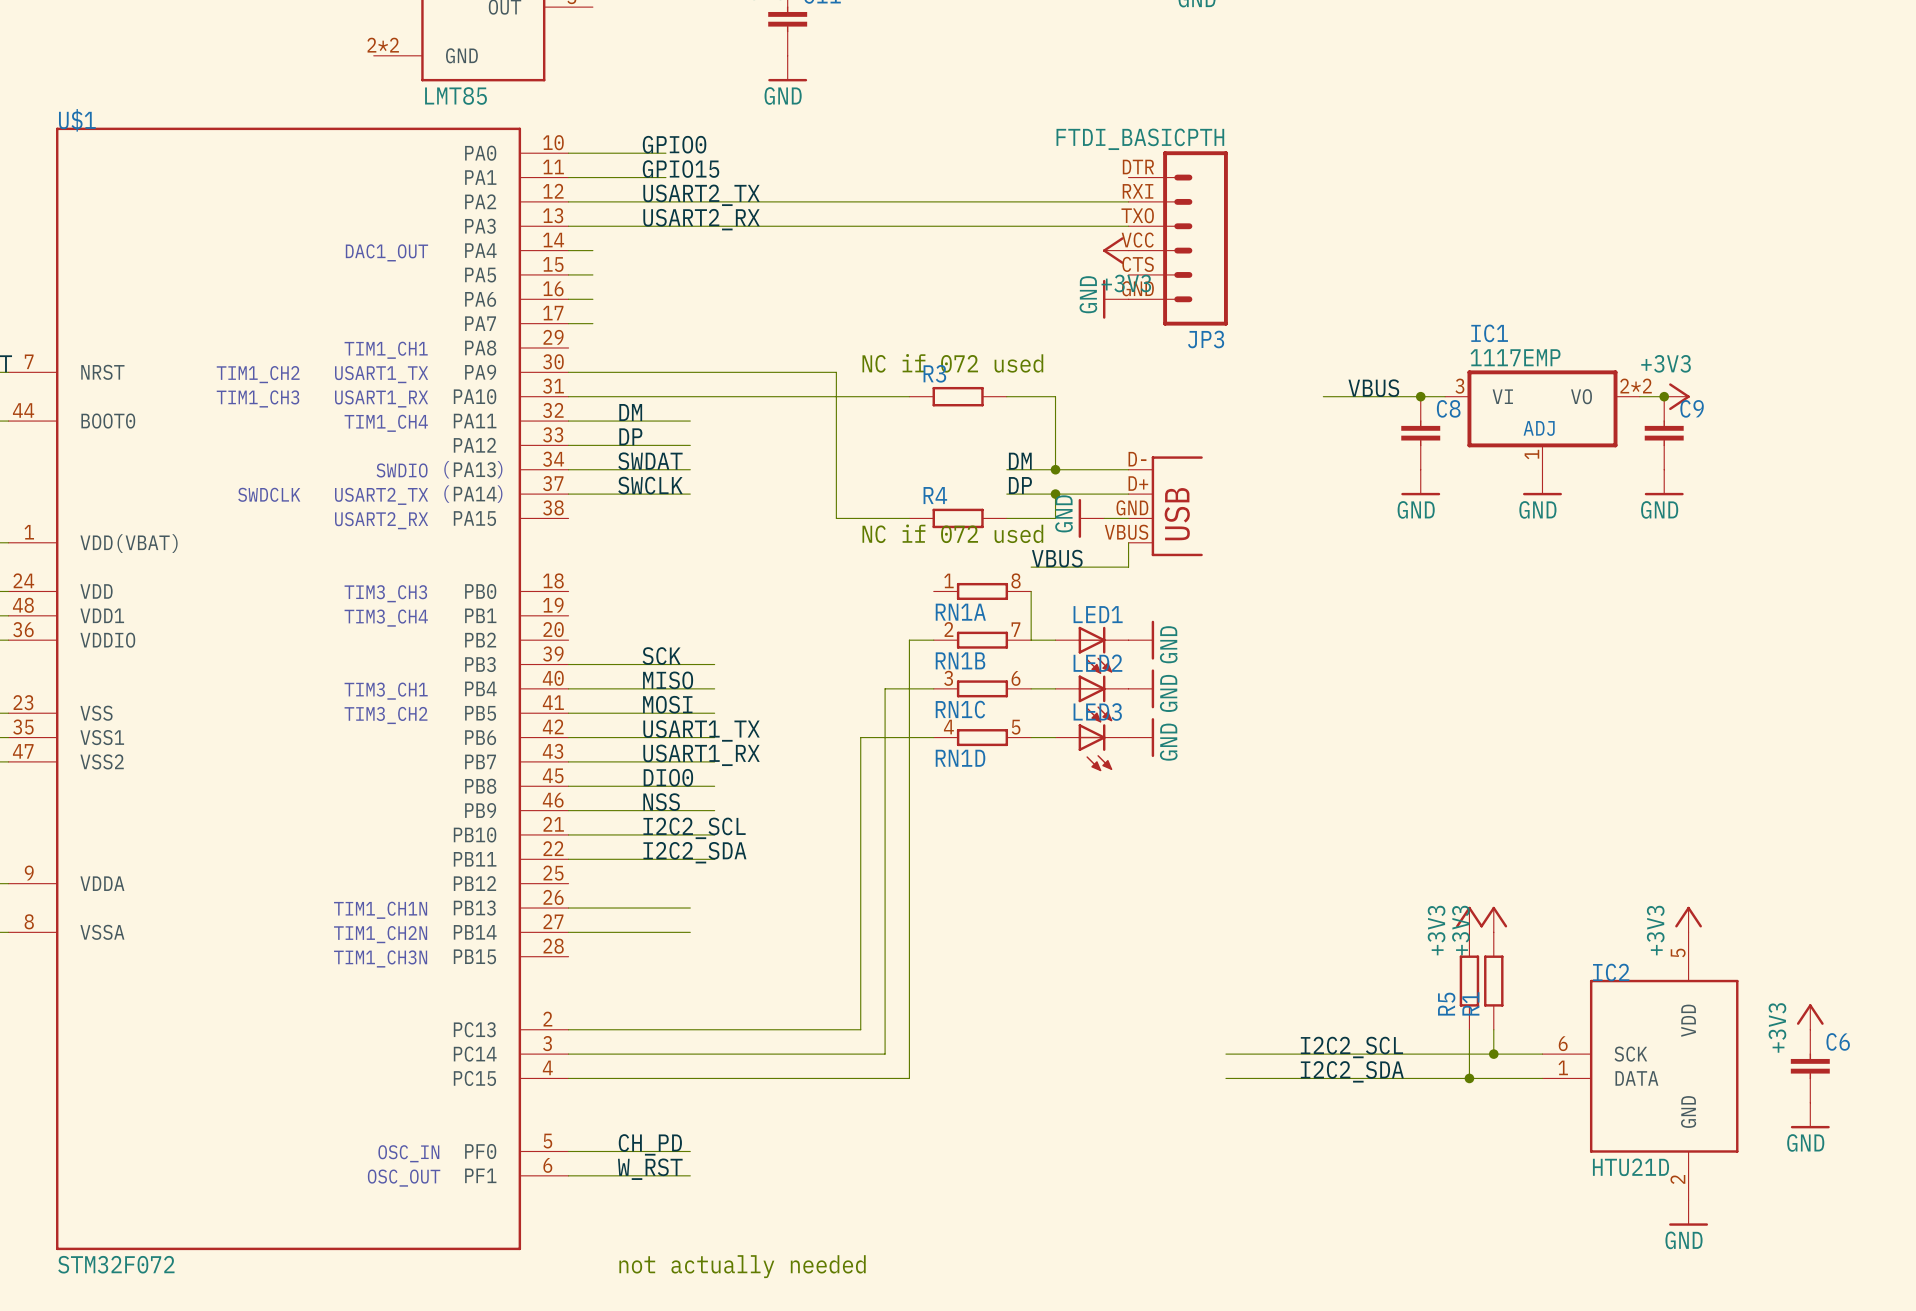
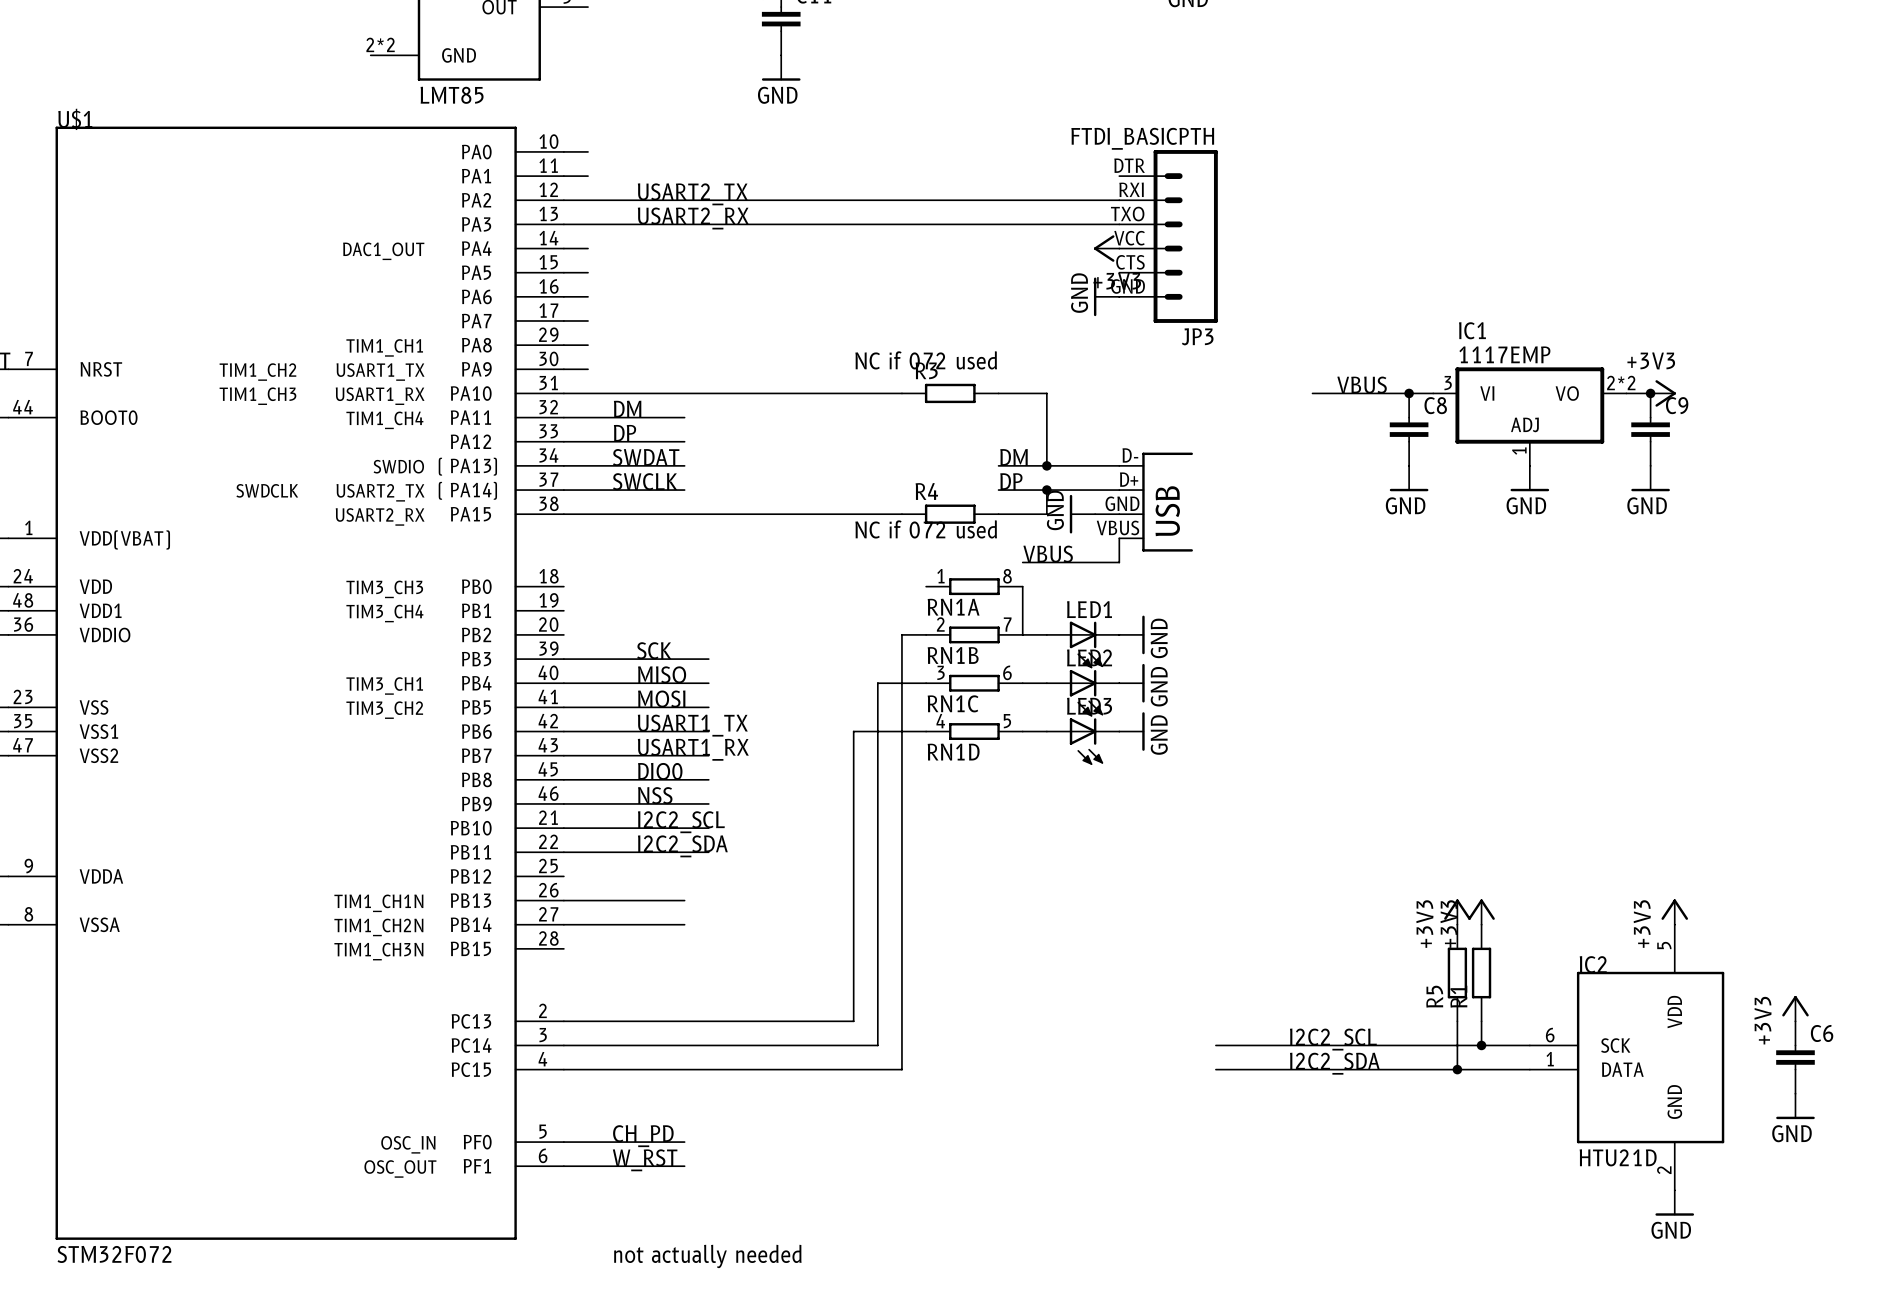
label: GPIO0 (674, 144) -> none
wire: (592, 153) (665, 153) -> none
label: GPIO15 (681, 169) -> none
wire: (592, 177) (665, 177) -> none
wire: none -> (563, 345) (588, 345)
wire: (592, 372) (836, 372) (836, 518) -> (563, 514) (829, 514)

